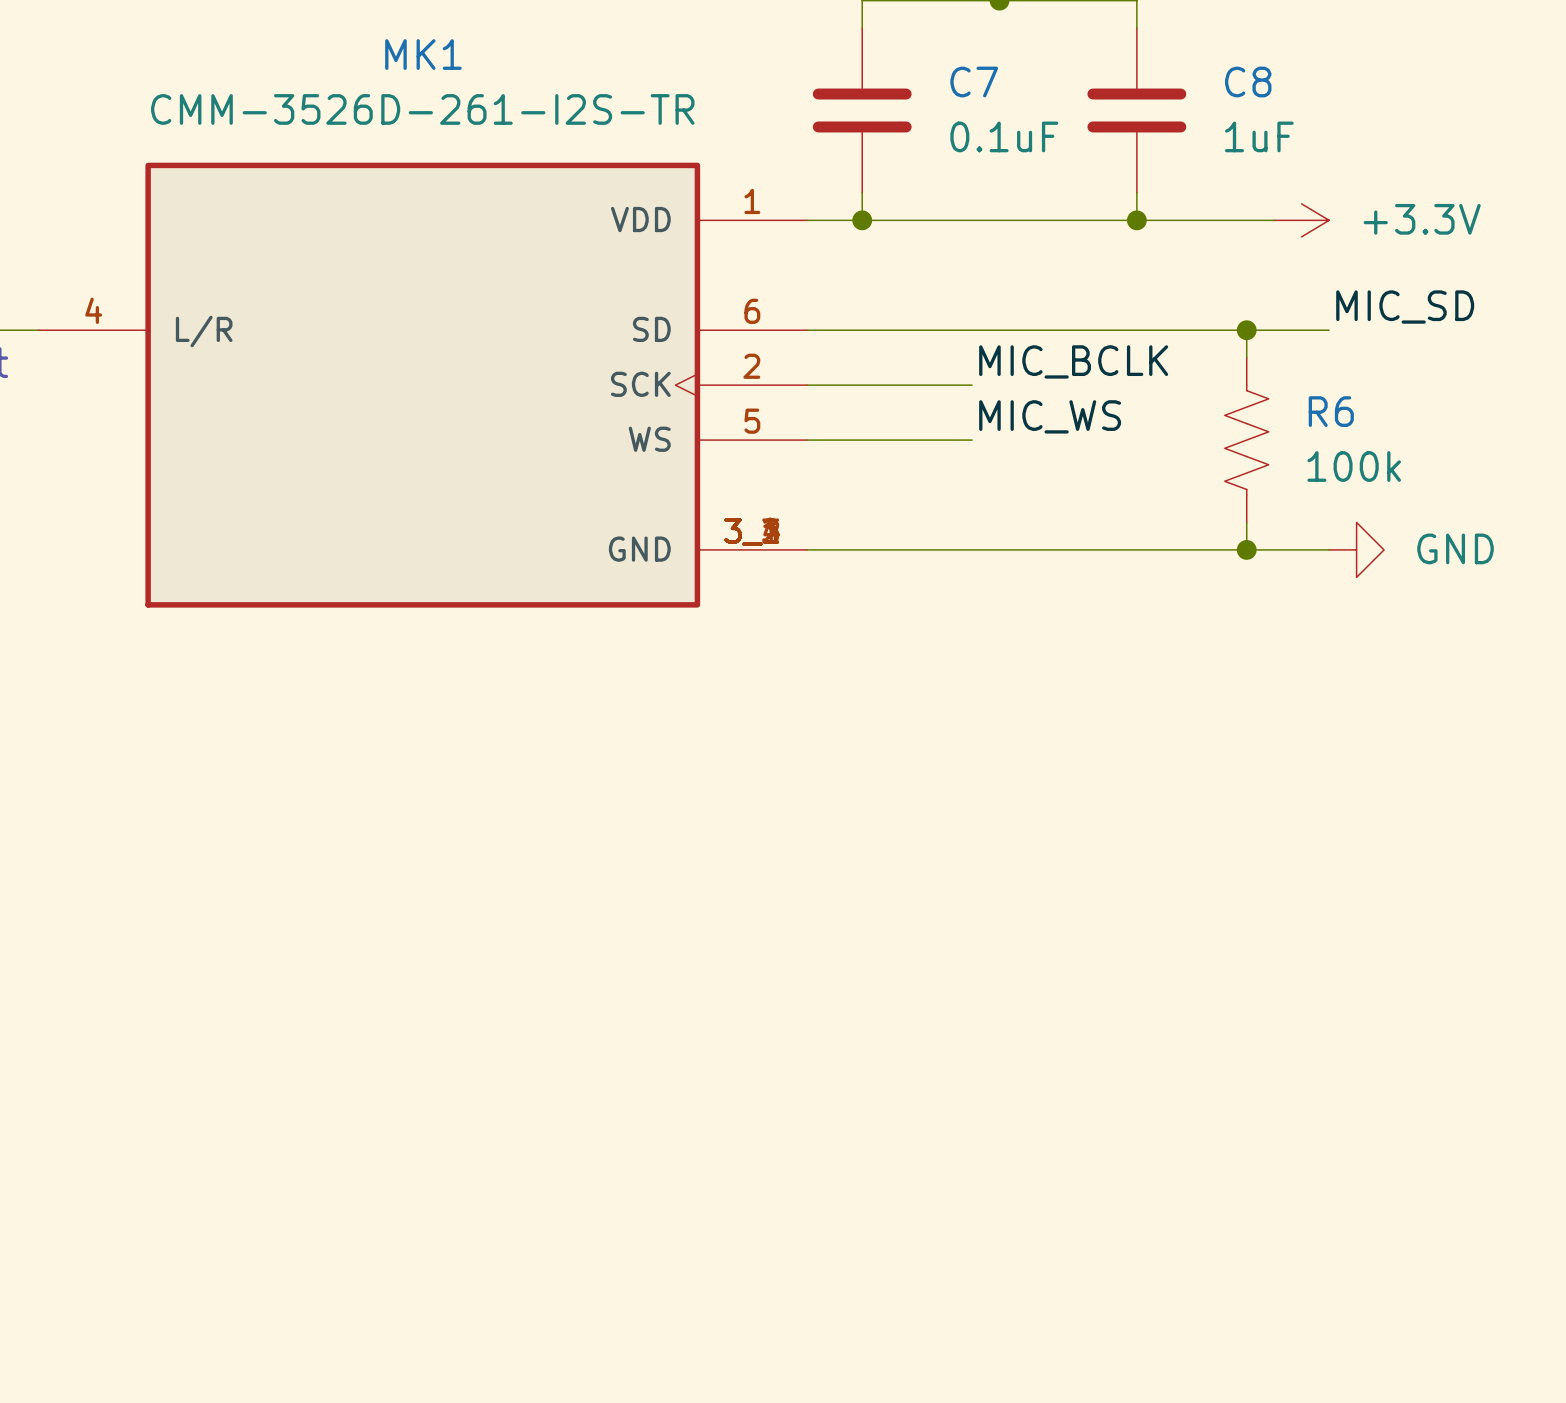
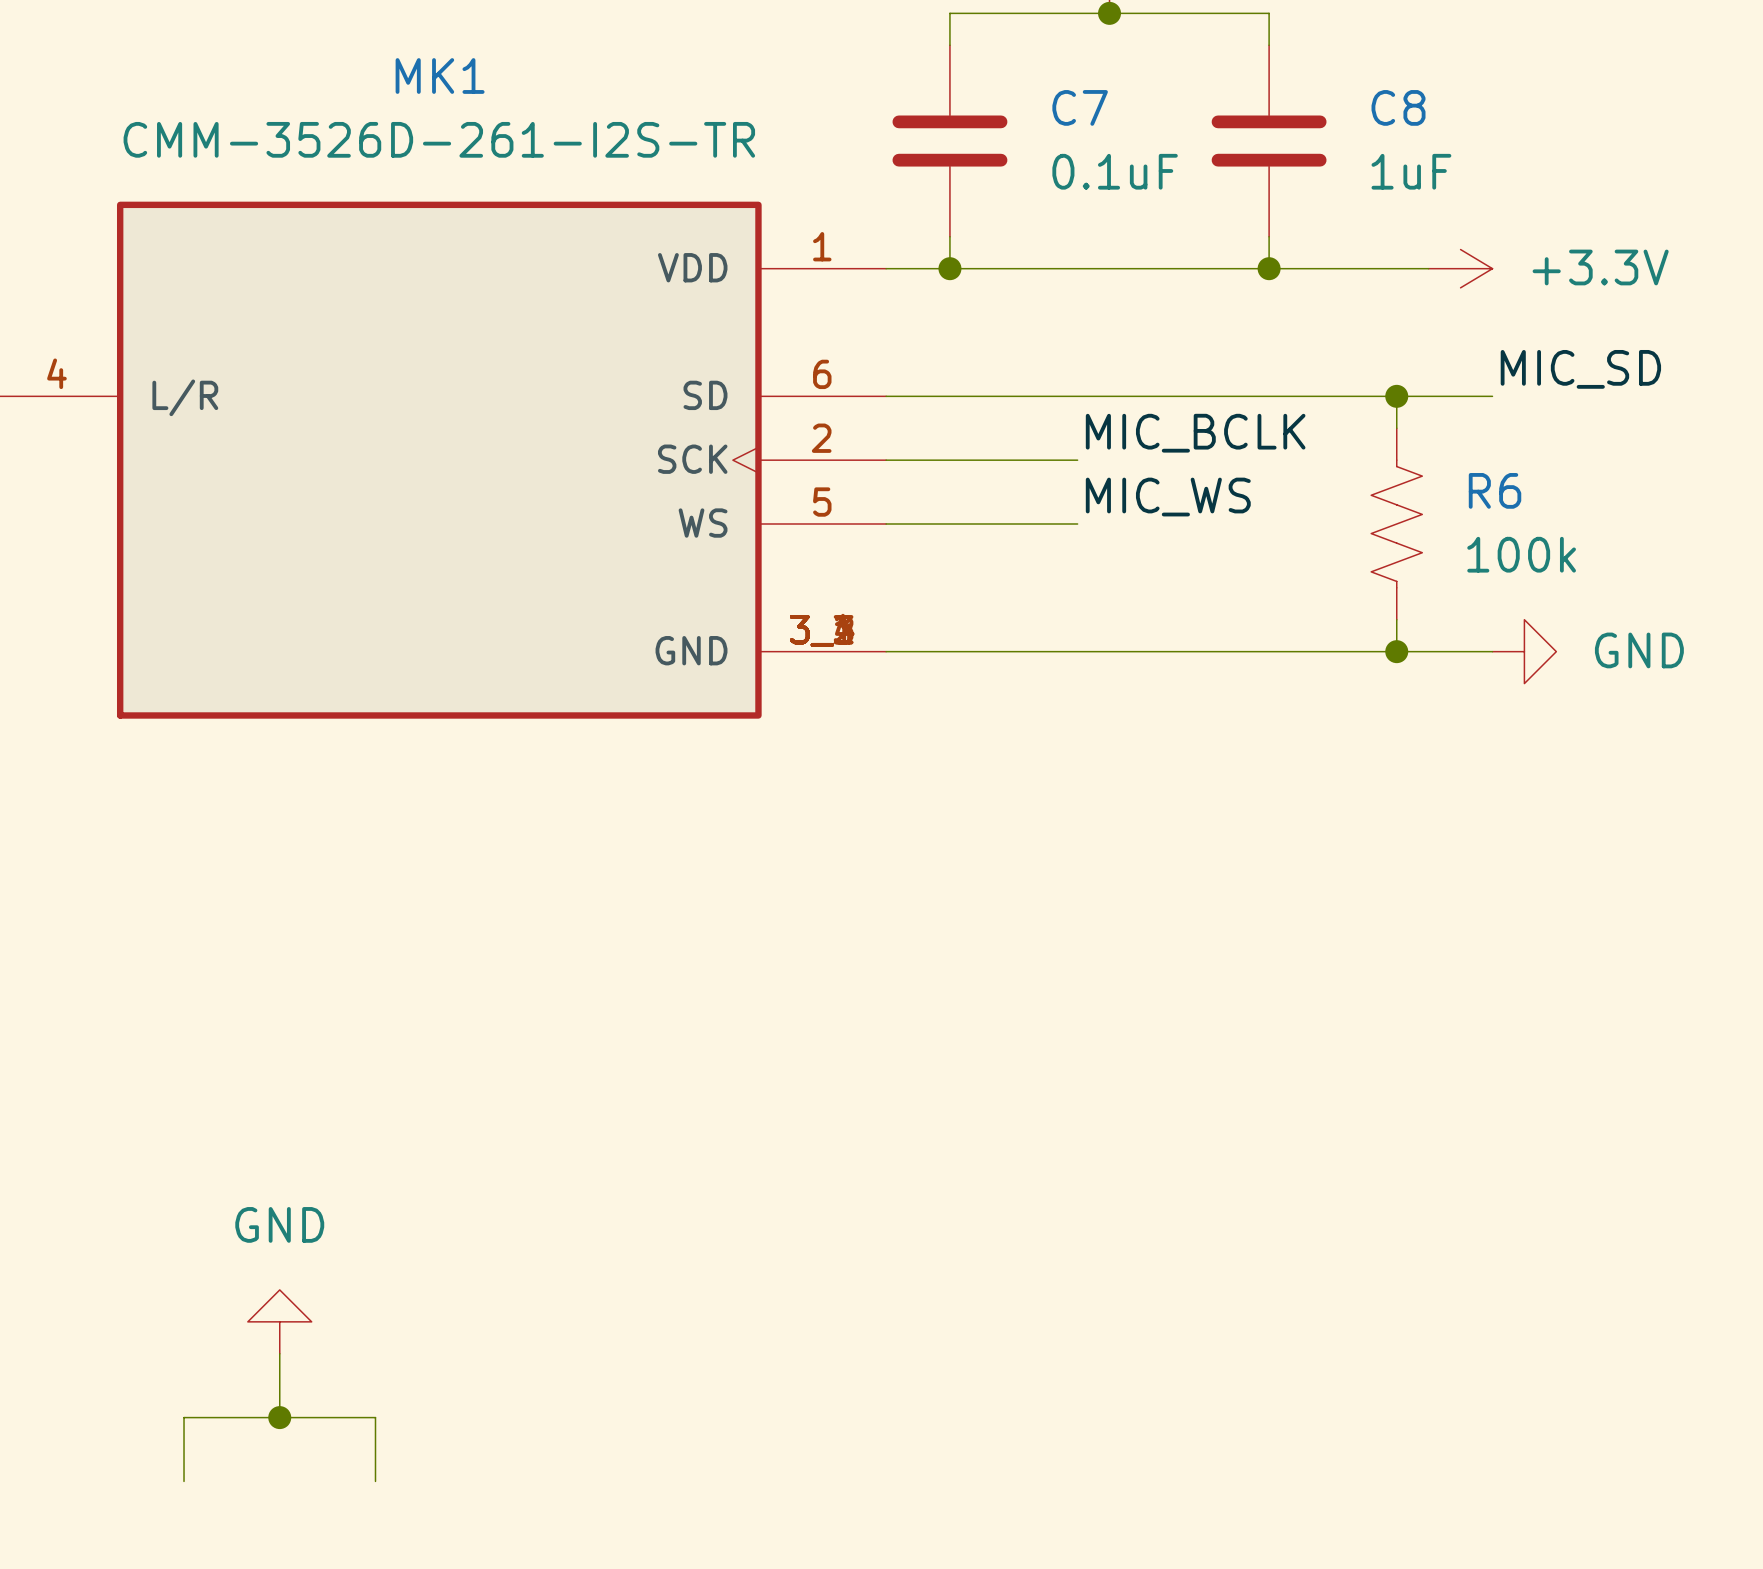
power symbol: none -> GND (279, 1321)
wire: none -> (279, 1353) (279, 1417)
junction: none -> (279, 1417)
wire: none -> (184, 1481) (184, 1417) (375, 1417) (375, 1481)

